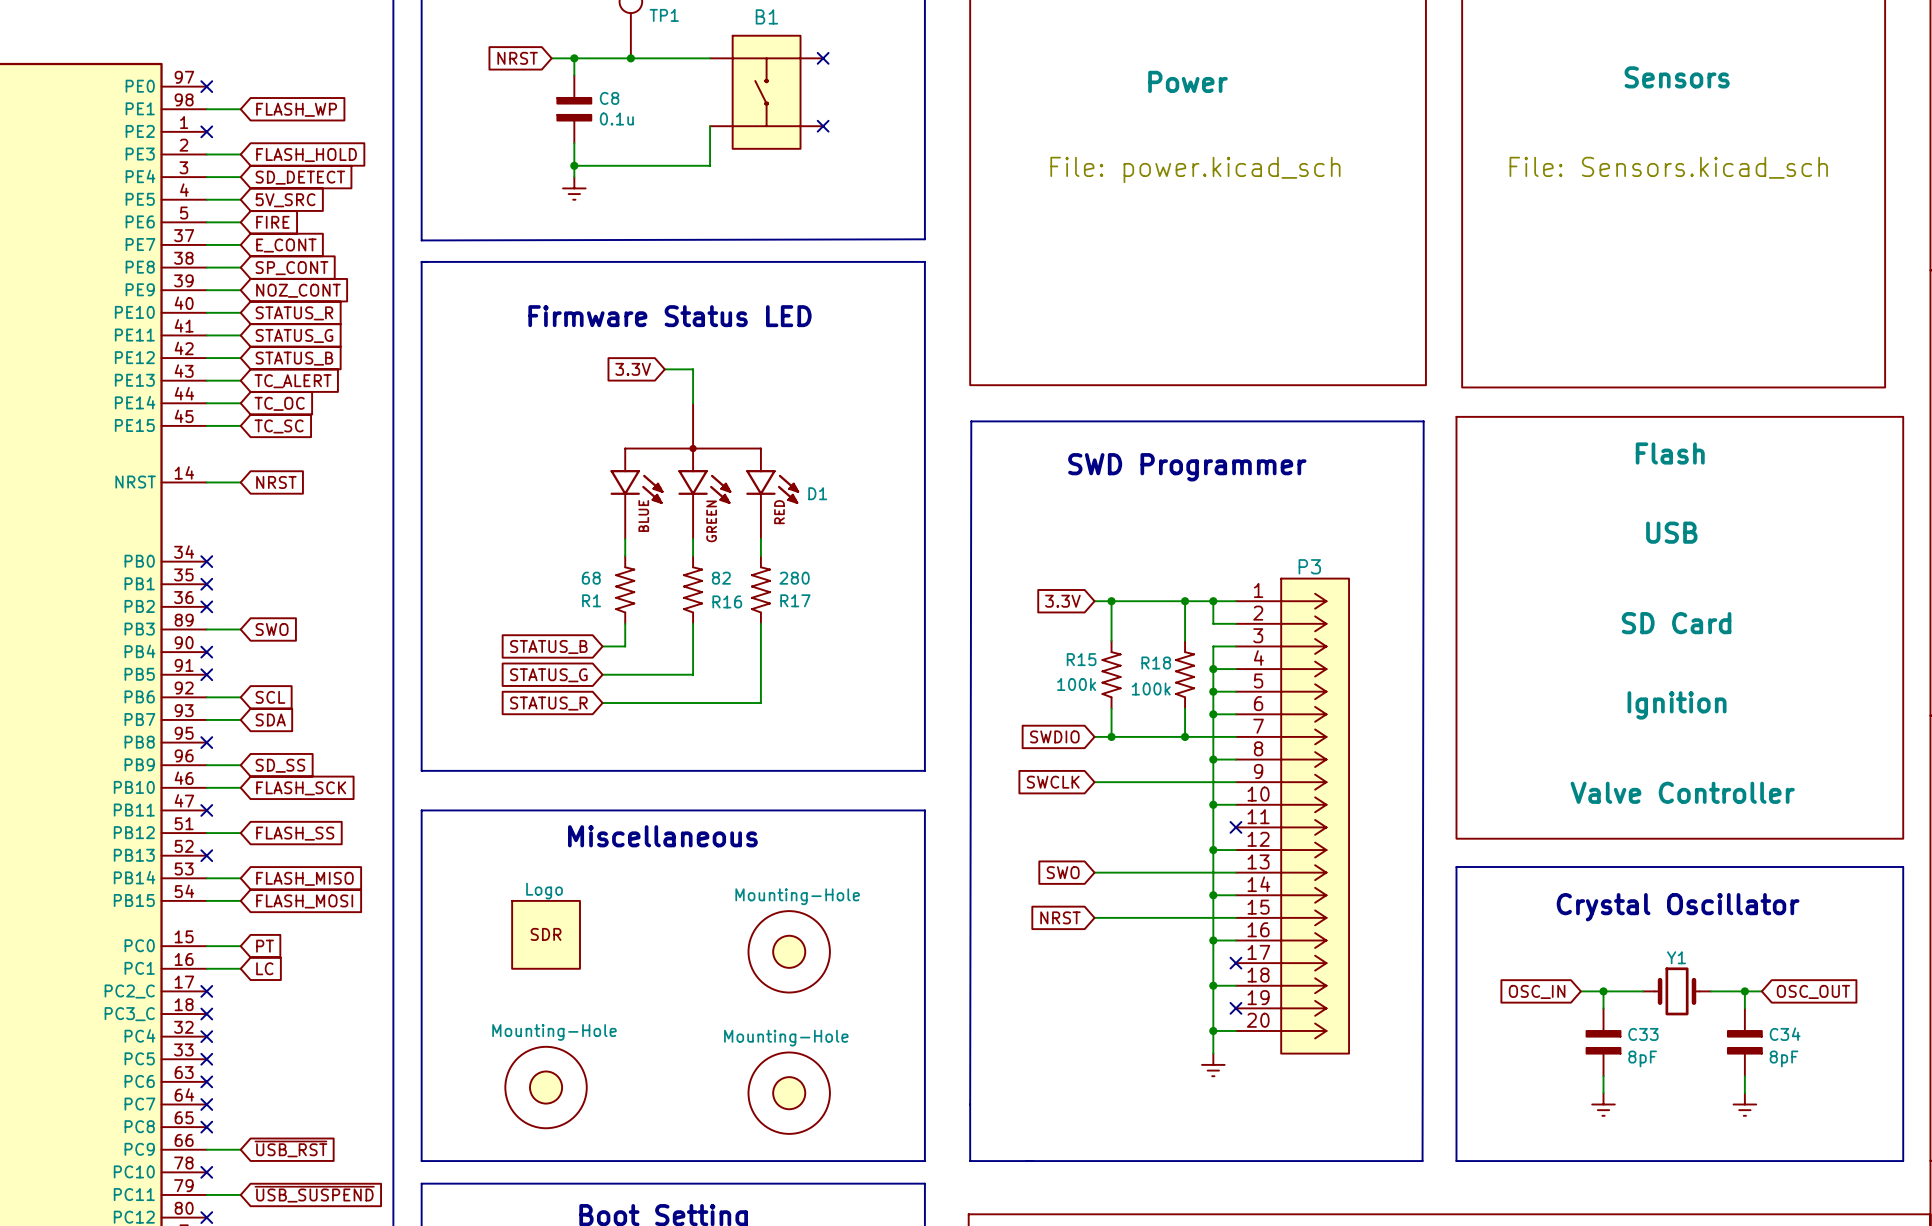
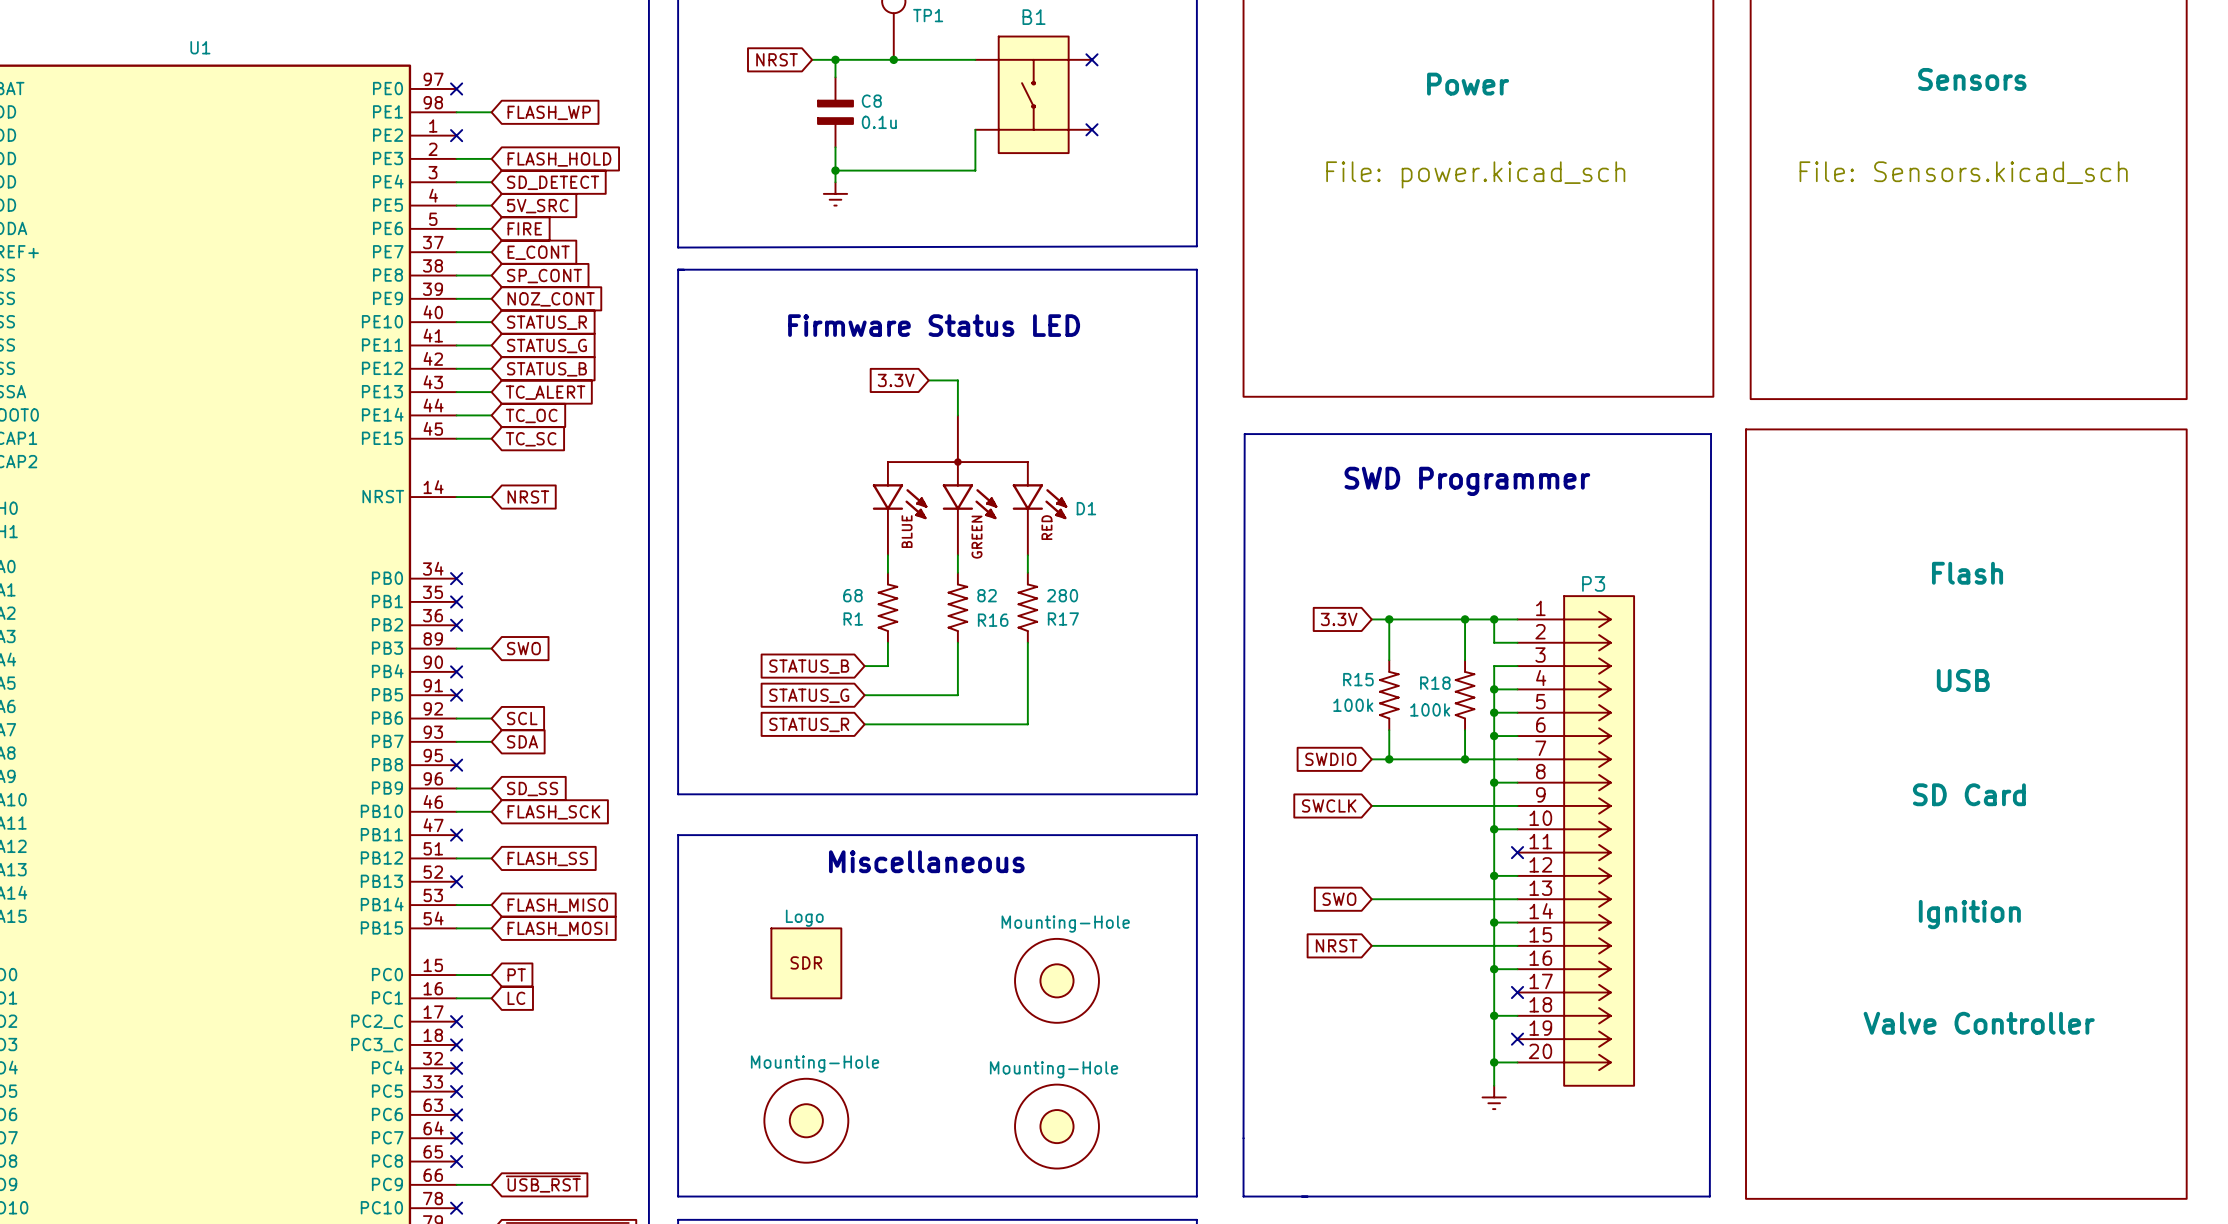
sheet: (1679, 627) -> none
sheet: none -> (1966, 814)
line: (1456, 866) (1456, 1161) (1903, 1161) (1903, 866) (1456, 866) -> none
text: Crystal Oscillator (1678, 907) -> none
global label: OSC_IN (1537, 991) -> none
wire: (1603, 991) (1603, 1008) -> none
junction: (1603, 991) -> none
Y1: (1677, 991) -> none
junction: (1744, 991) -> none
global label: OSC_OUT (1813, 991) -> none
C33: 8pF (1603, 1042) -> none
C34: 8pF (1744, 1042) -> none
wire: (1603, 1076) (1603, 1093) -> none
wire: (1744, 1076) (1744, 1093) -> none
power symbol: (1603, 1104) -> none
power symbol: (1744, 1104) -> none

